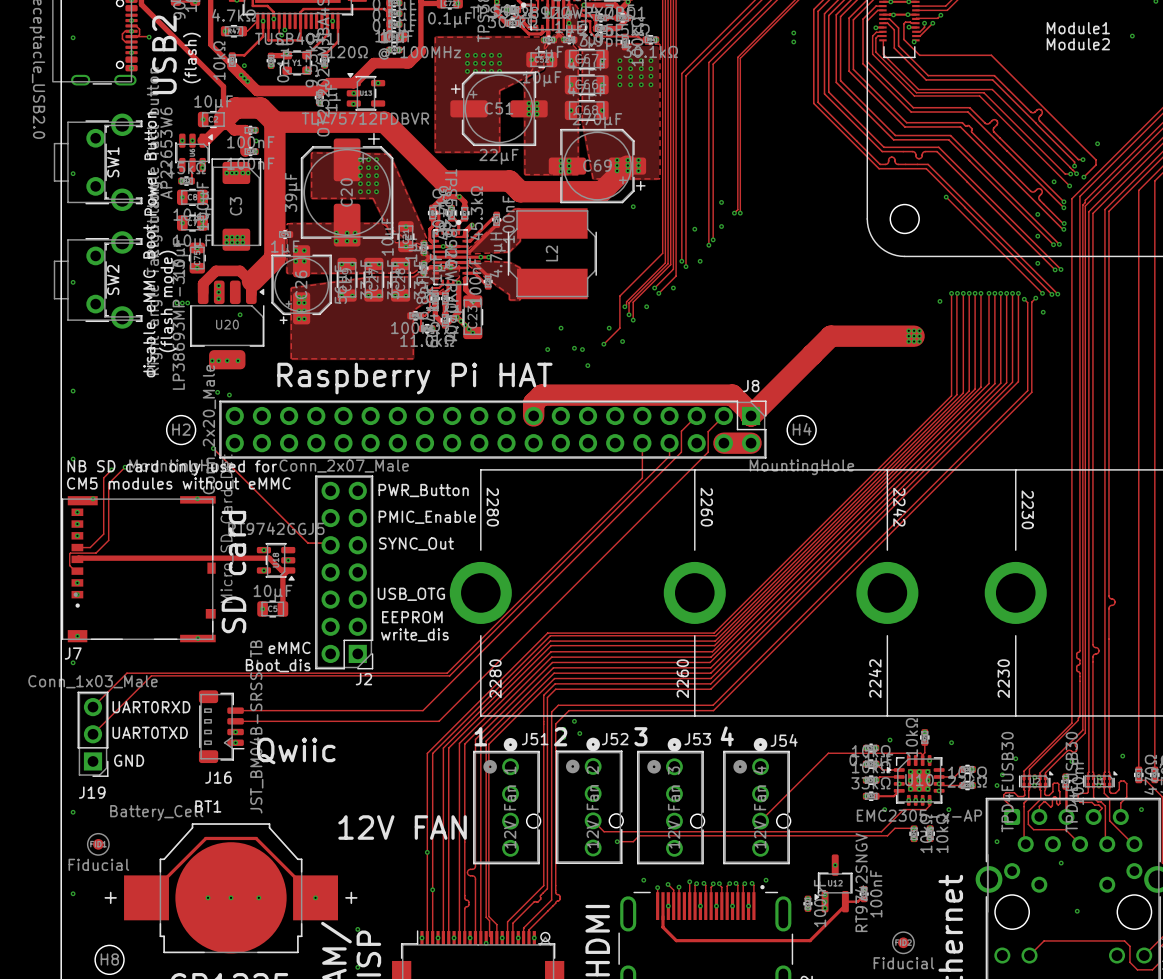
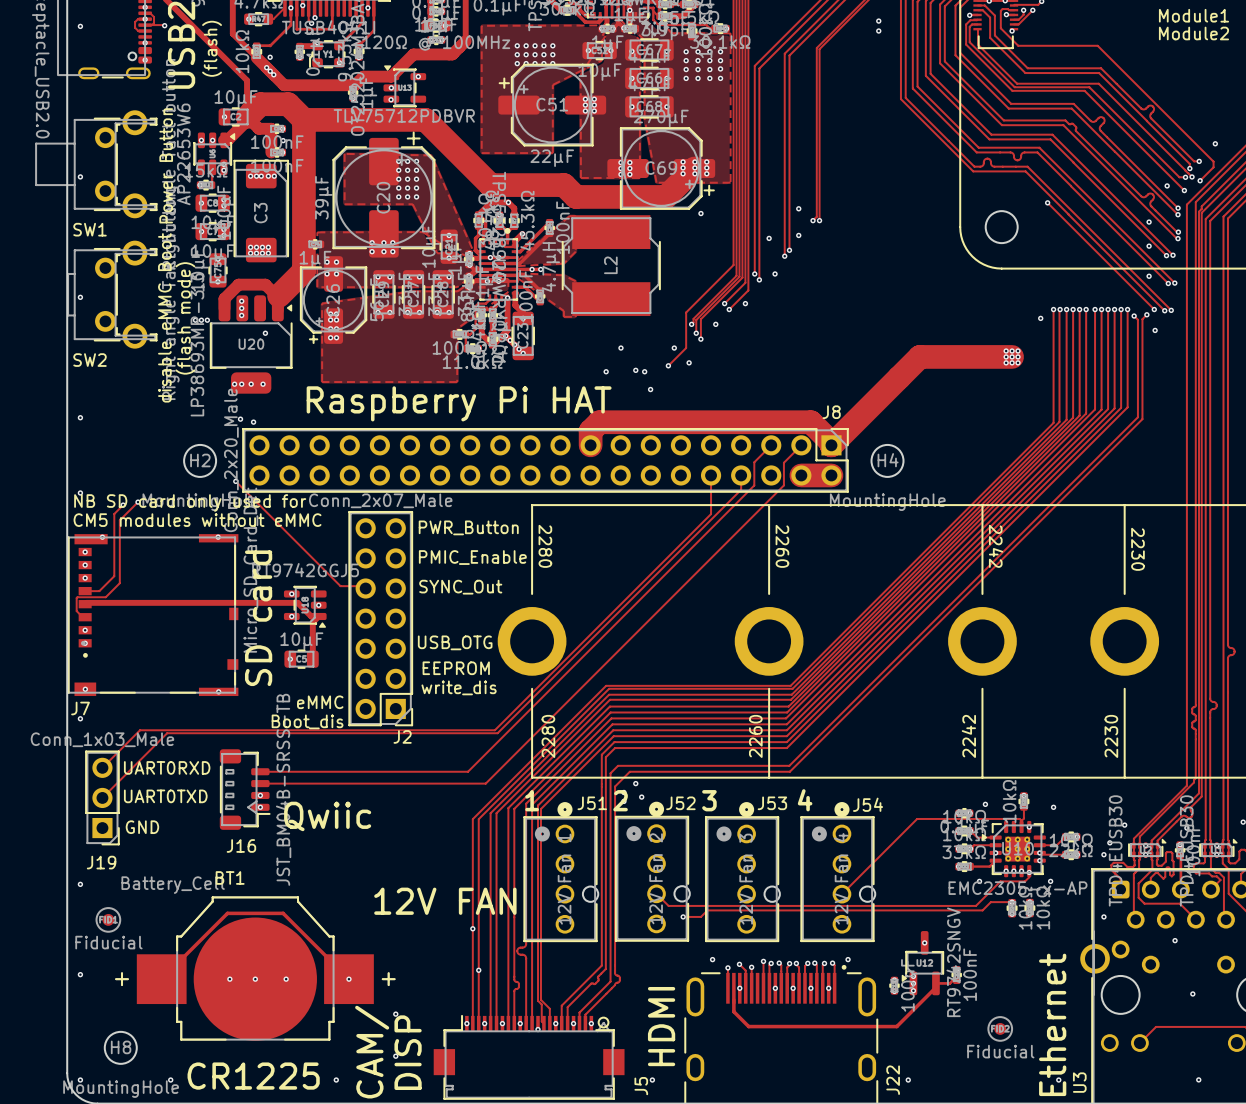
SW1 footprint: [53, 113, 143, 212] -> [35, 110, 158, 219]
SW1 name position: SW1 (113, 162) -> SW1 (90, 229)
SW2 footprint: [53, 231, 143, 329] -> [67, 240, 158, 349]
SW2 name rotation: 0° (113, 280) -> 90° clockwise (90, 360)
SW2 name position: SW2 (113, 280) -> SW2 (90, 360)

